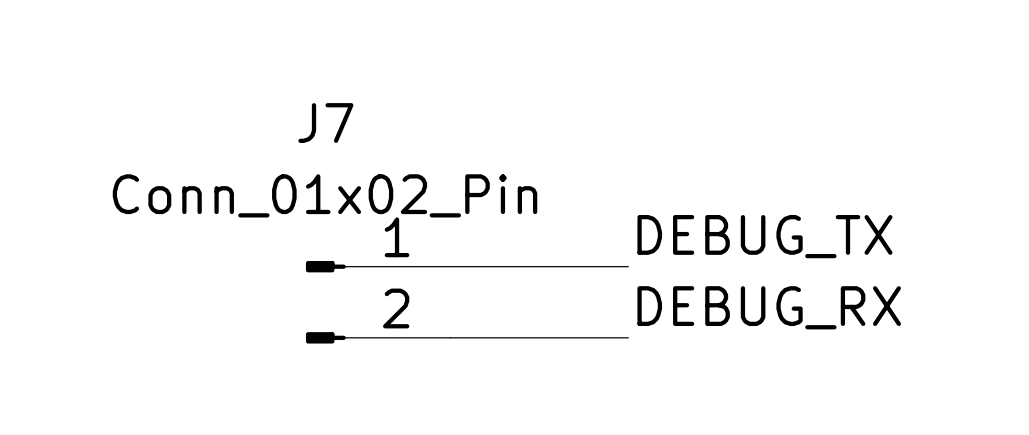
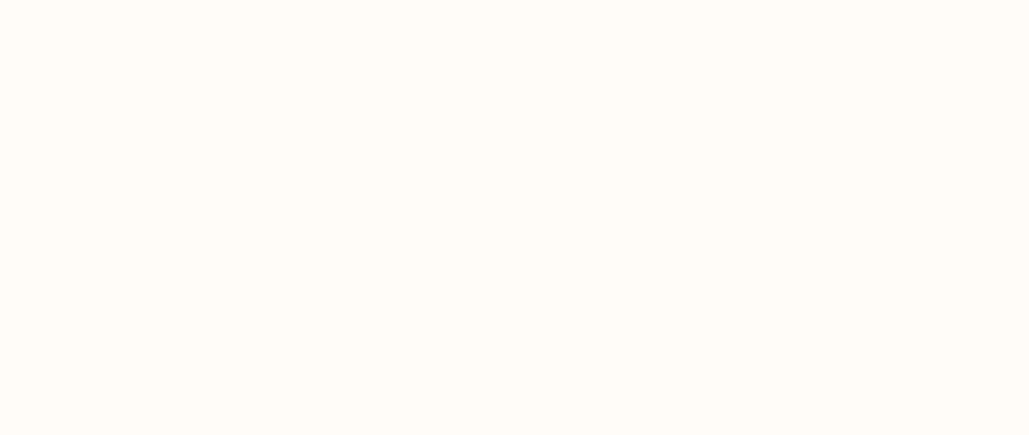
label: DEBUG_TX (764, 236) -> none
wire: (450, 266) (628, 266) -> none
J7: Conn_01x02_Pin (378, 302) -> none
label: DEBUG_RX (769, 307) -> none
wire: (450, 337) (628, 337) -> none

